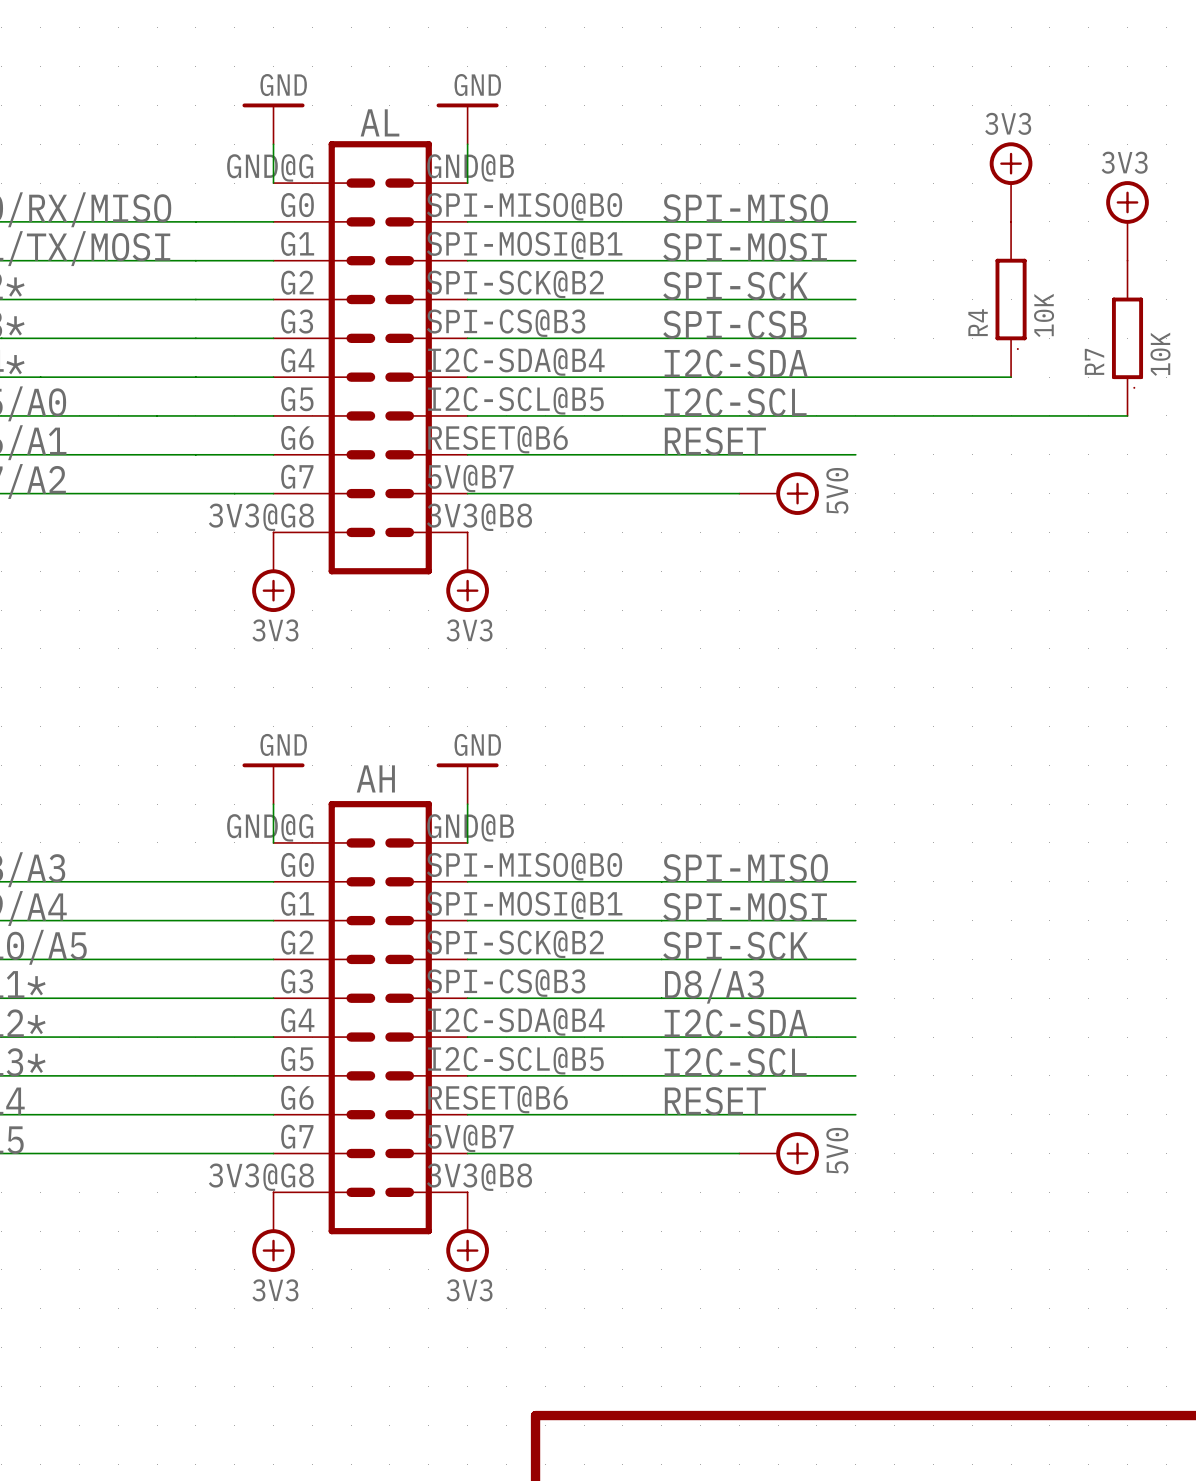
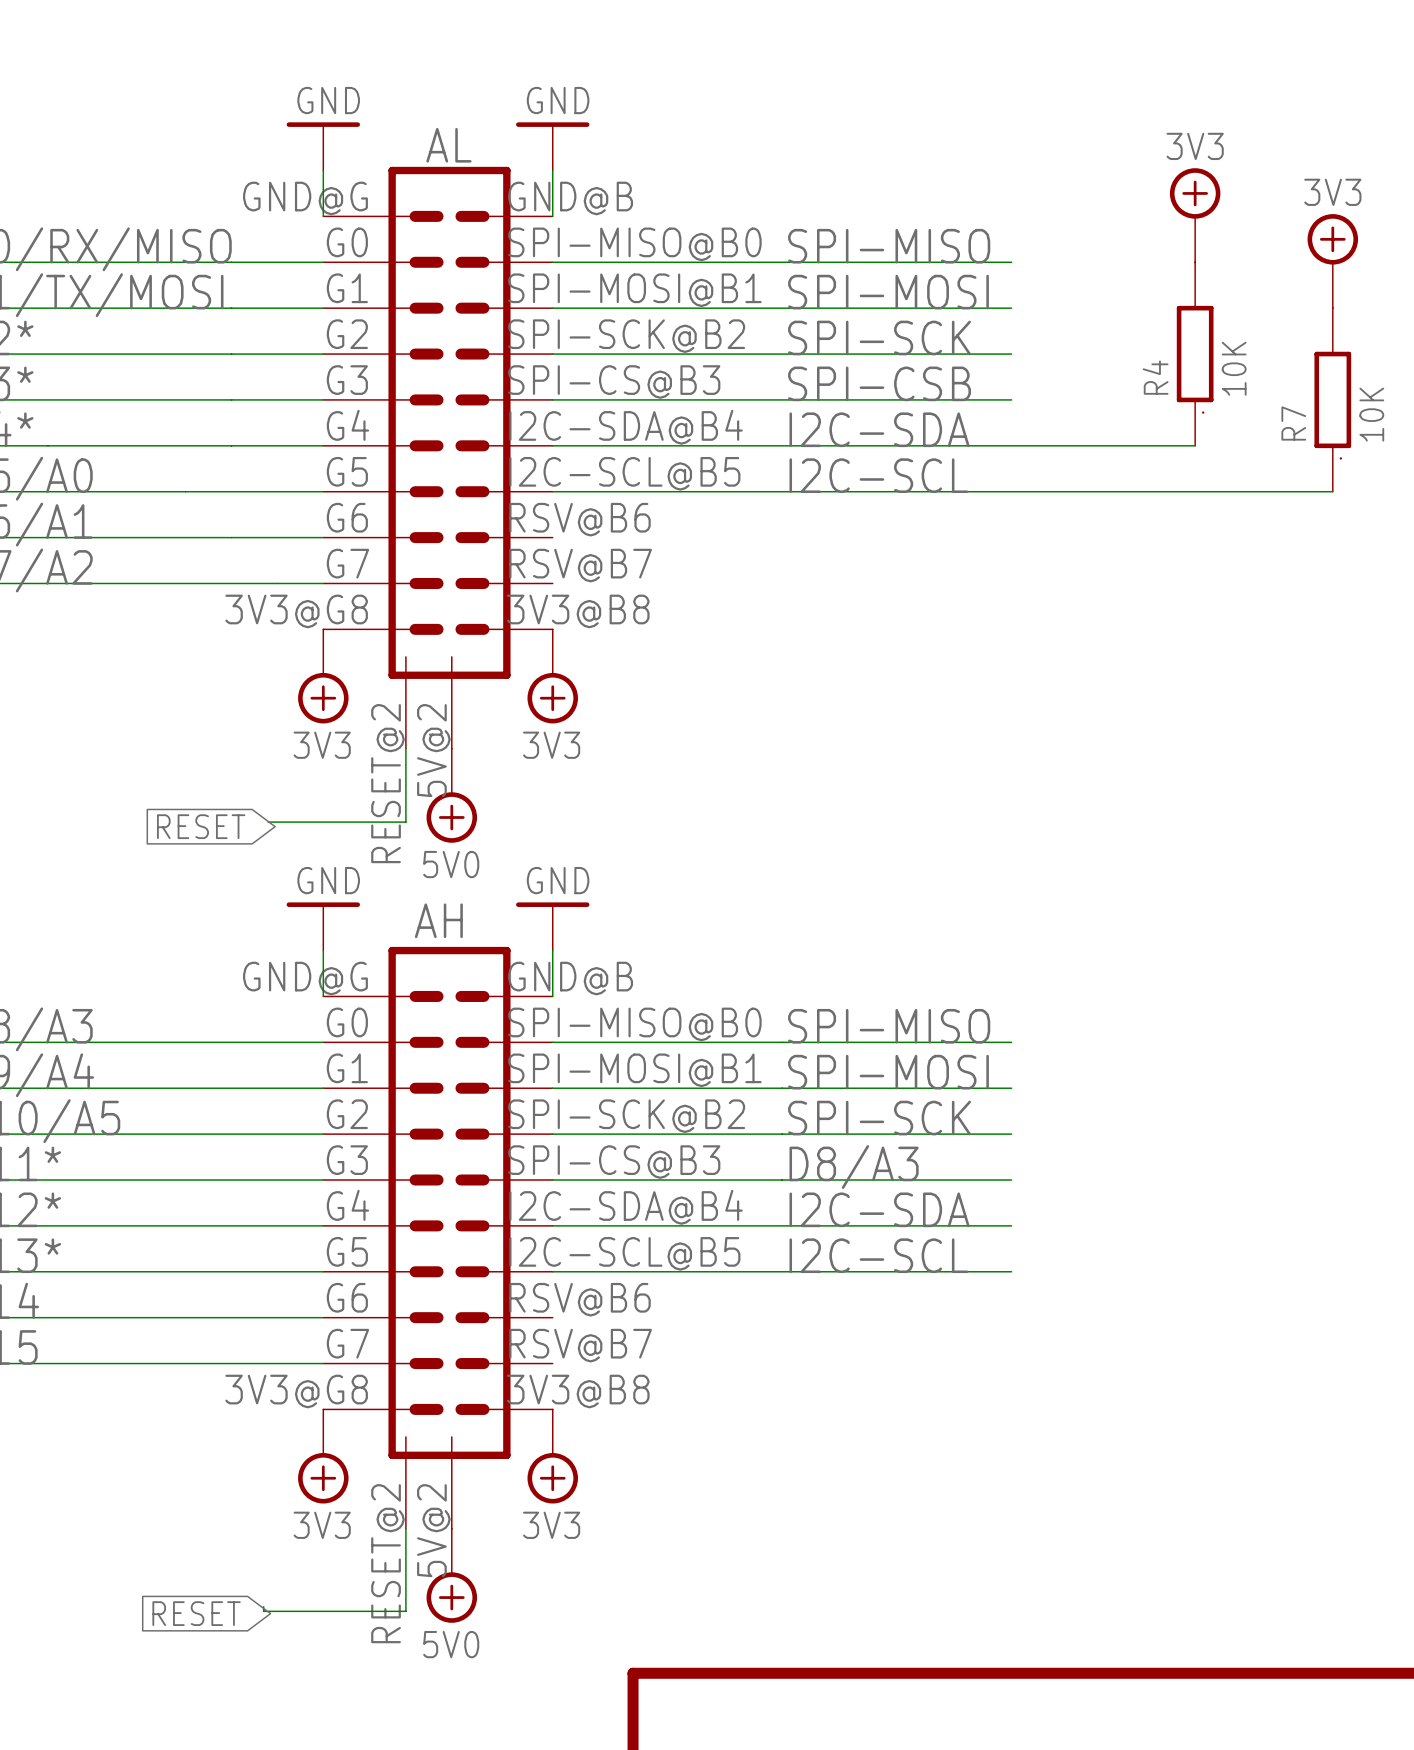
AL: (370, 357) -> none
AL: none -> (438, 457)
label: RESET (715, 441) -> none
wire: (467, 454) (855, 454) -> none
wire: (467, 493) (739, 493) -> none
power symbol: 5V0 (779, 493) -> none
wire: none -> (405, 748) (405, 822) (268, 822)
power symbol: none -> 5V0 (451, 795)
global label: none -> RESET (201, 826)
AH: (370, 1017) -> none
AH: none -> (438, 1237)
label: RESET (715, 1101) -> none
wire: (467, 1114) (855, 1114) -> none
wire: (467, 1153) (739, 1153) -> none
power symbol: 5V0 (779, 1153) -> none
wire: none -> (405, 1528) (405, 1611) (263, 1611) (263, 1606)
power symbol: none -> 5V0 (451, 1575)
global label: none -> RESET (196, 1613)

